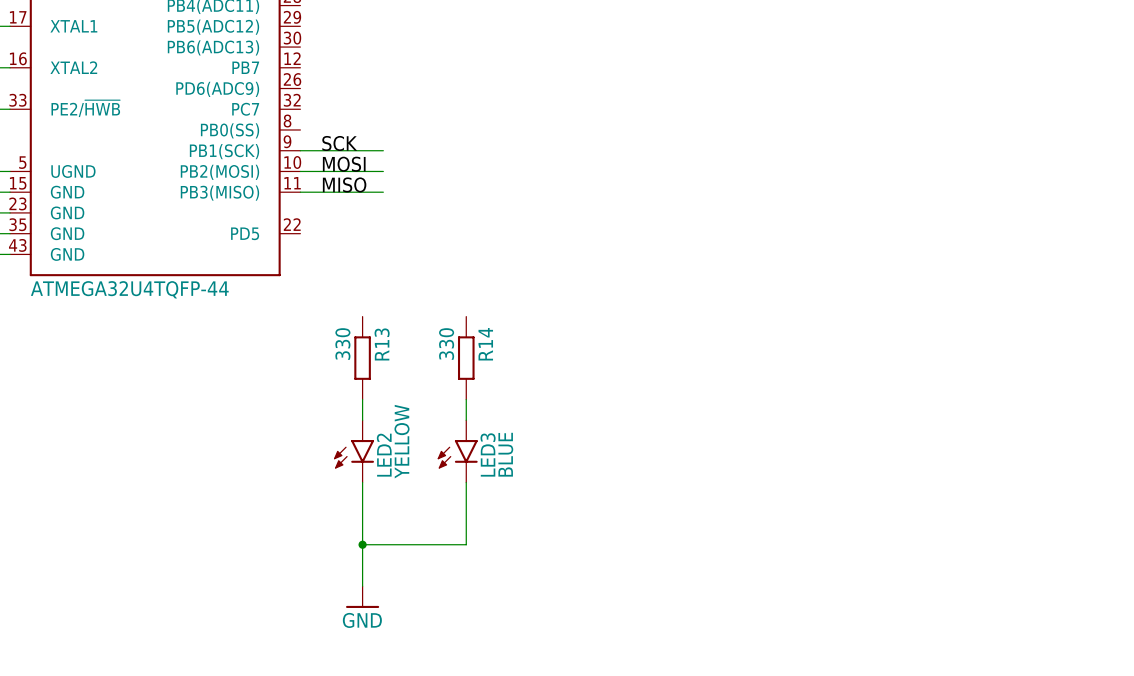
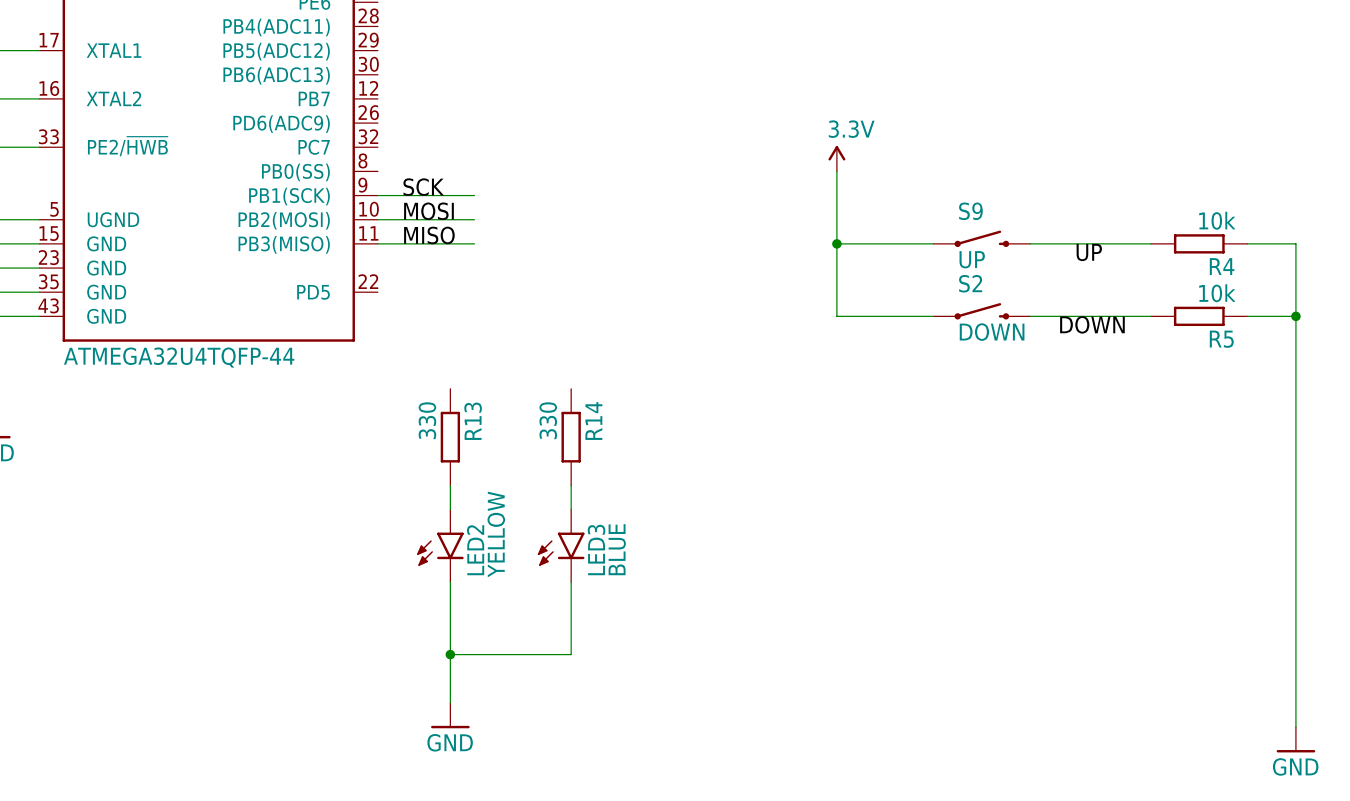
power symbol: none -> 3.3V (836, 158)
wire: none -> (836, 171) (836, 316) (933, 316)
S9: none -> UP (981, 238)
wire: none -> (836, 243) (933, 243)
junction: none -> (836, 243)
wire: none -> (1030, 243) (1150, 243)
R4: none -> 10k (1199, 243)
wire: none -> (1247, 243) (1295, 243) (1295, 727)
label: none -> UP (1089, 252)
S2: none -> DOWN (981, 311)
wire: none -> (1030, 316) (1150, 316)
R5: none -> 10k (1199, 316)
wire: none -> (1247, 316) (1295, 316)
junction: none -> (1295, 316)
label: none -> DOWN (1092, 324)
power symbol: none -> GND (1295, 739)

